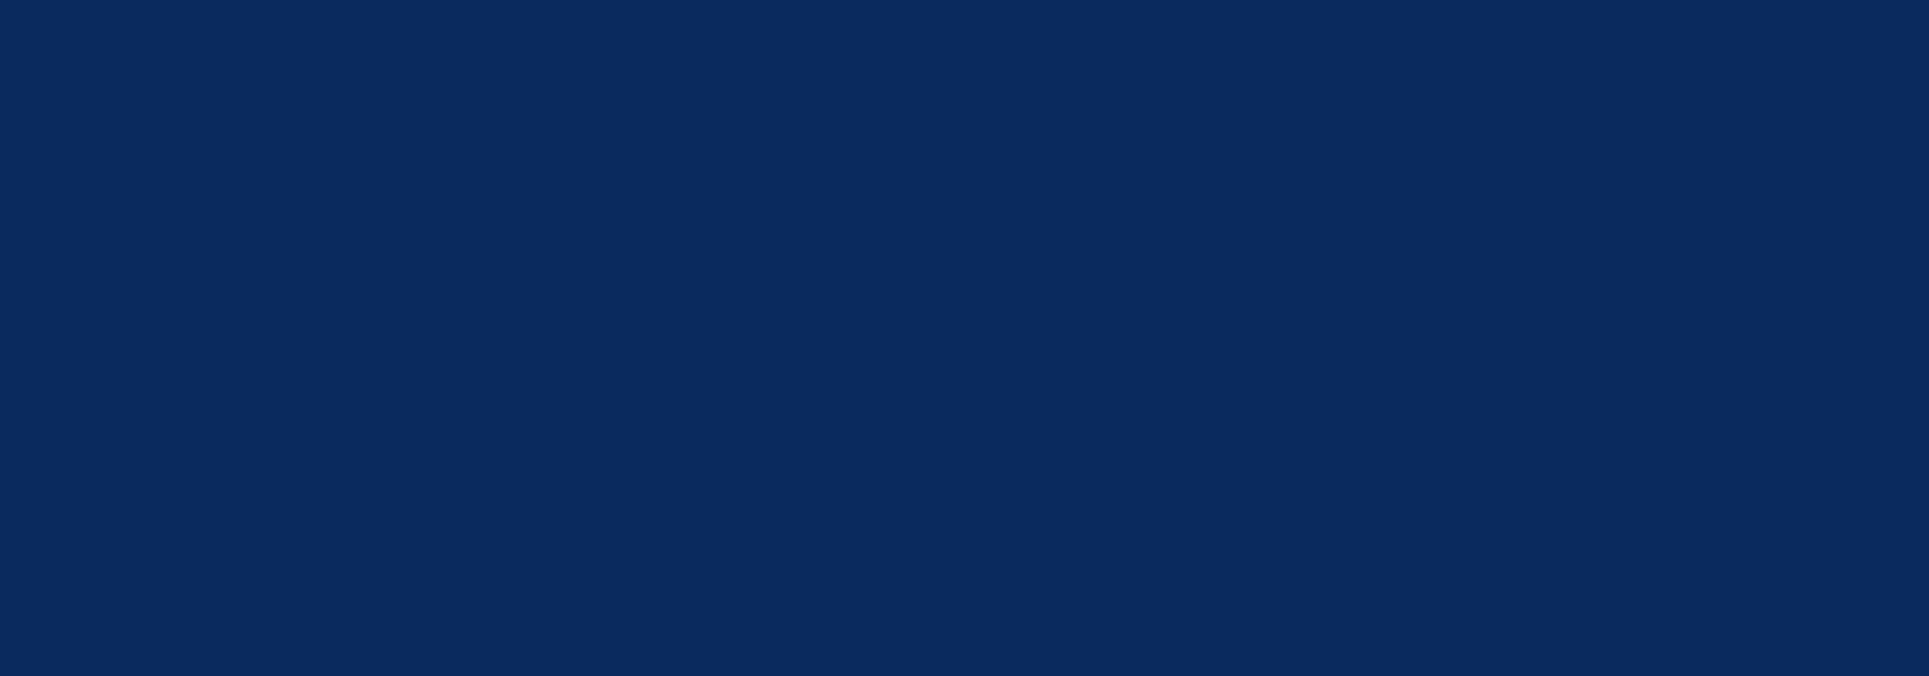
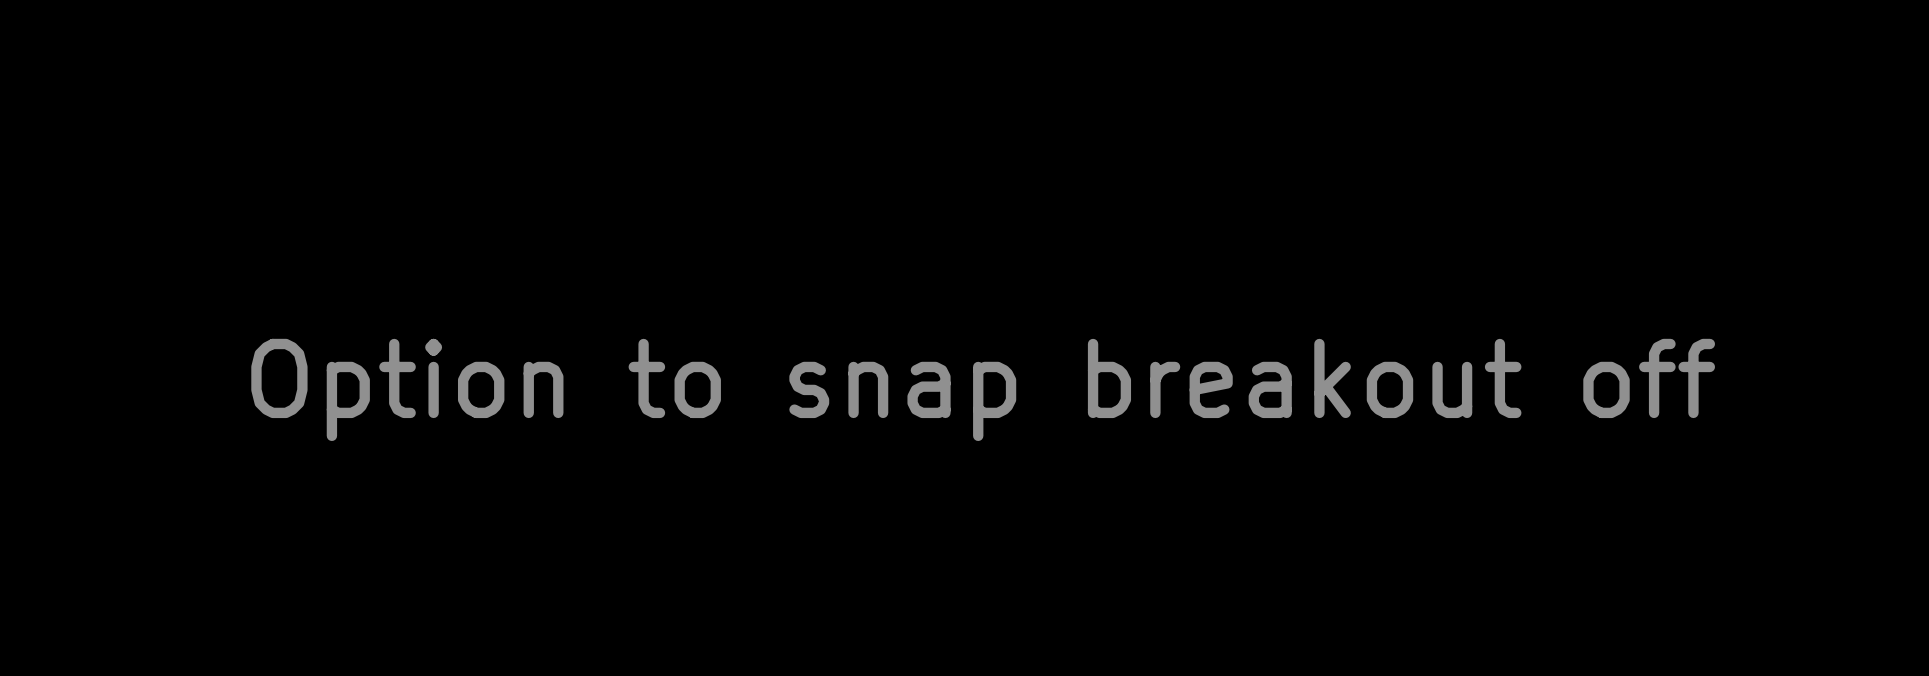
text: none -> Option to snap breakout off (983, 389)

